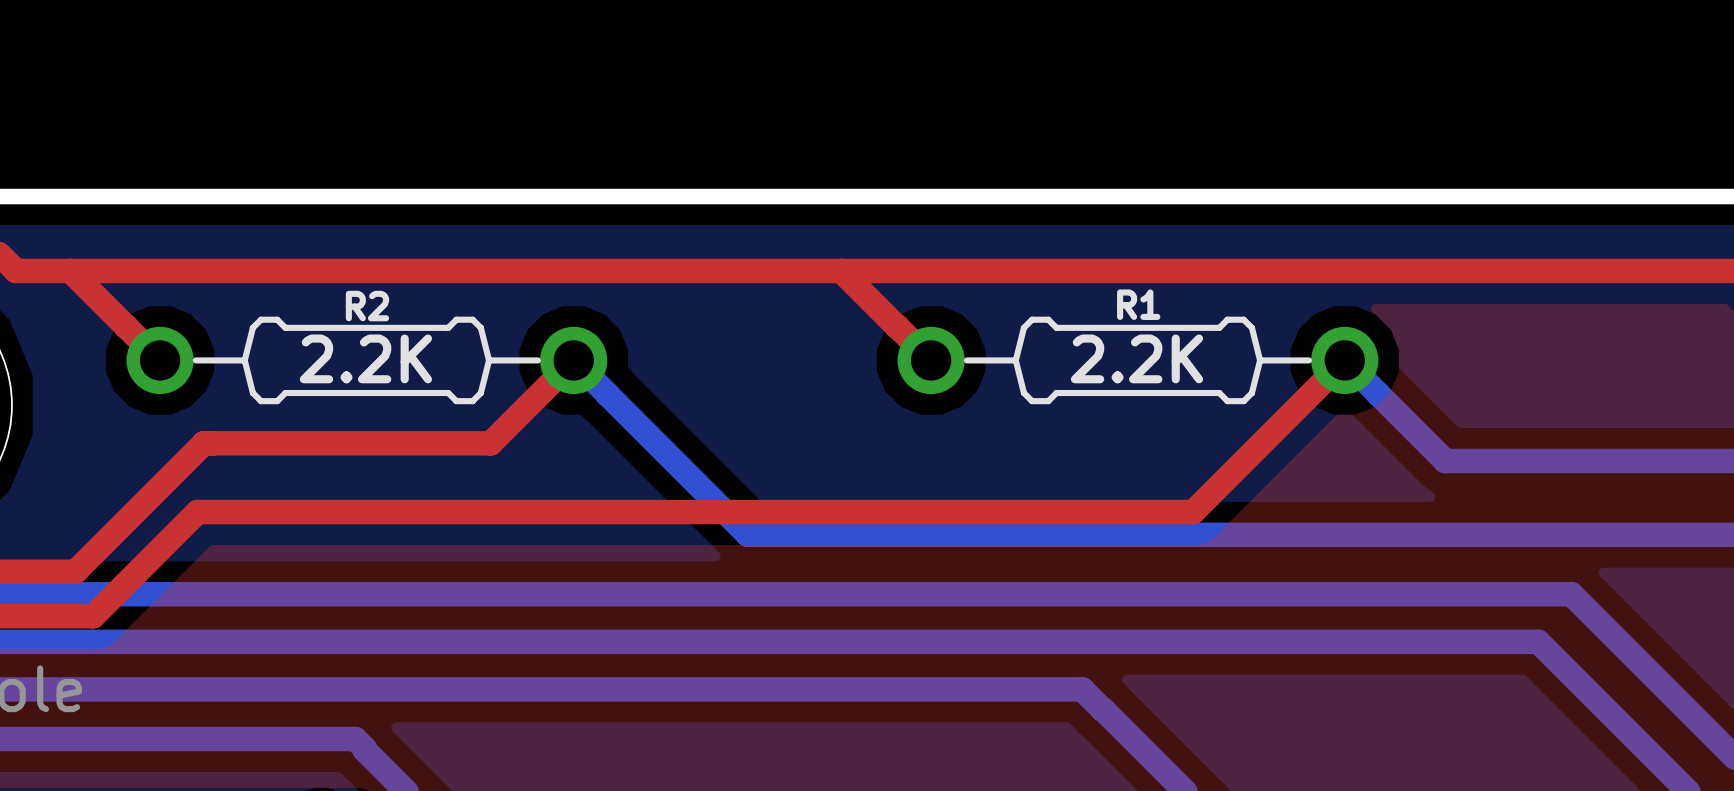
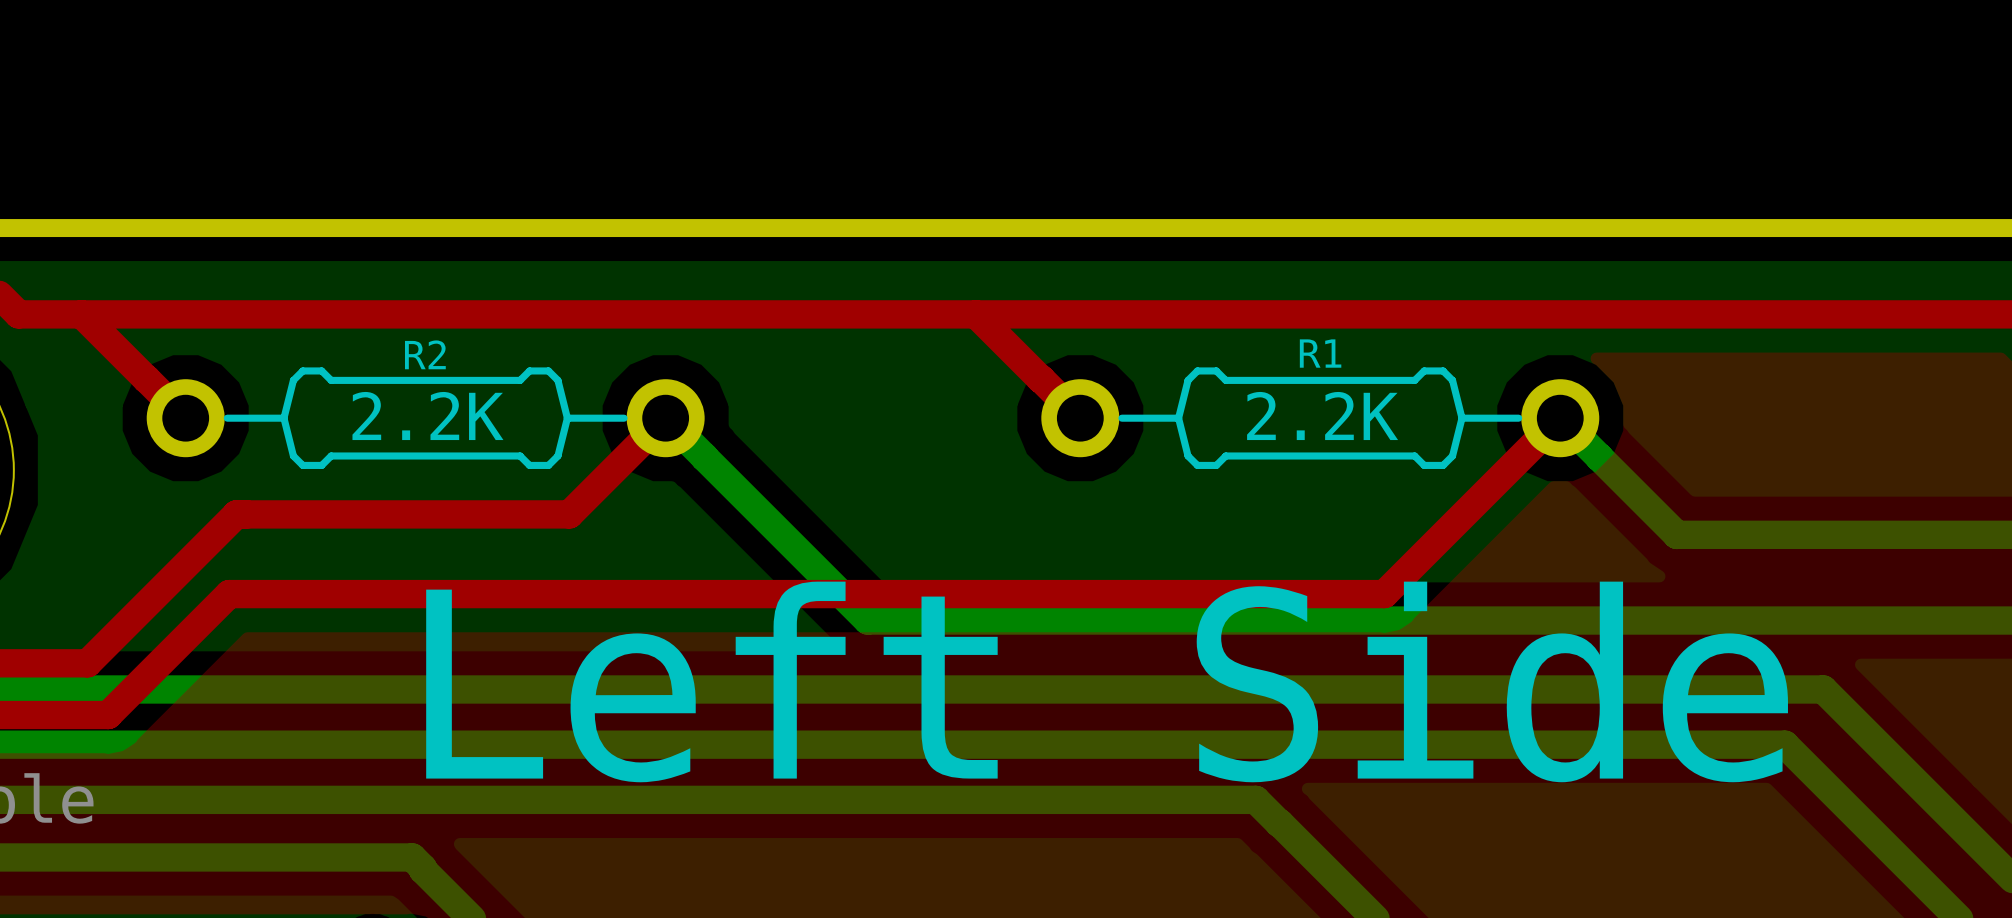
drawing: none -> [426, 581, 1788, 783]

